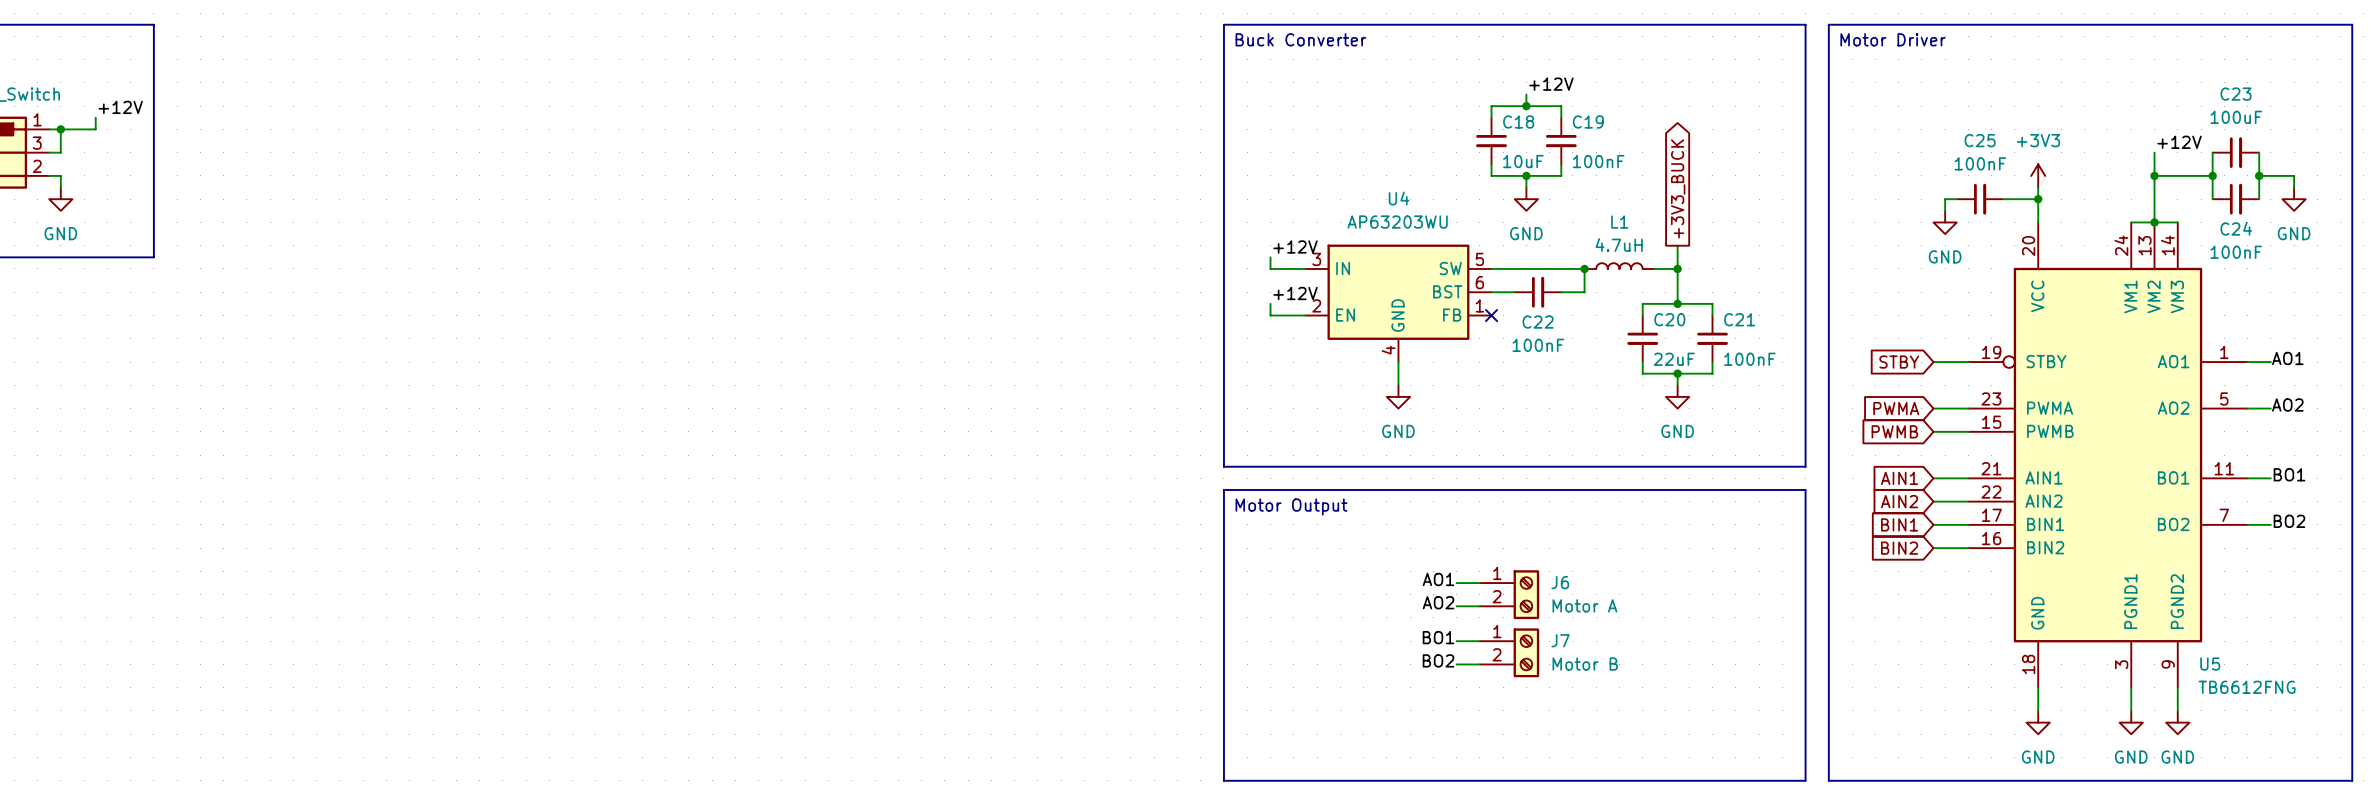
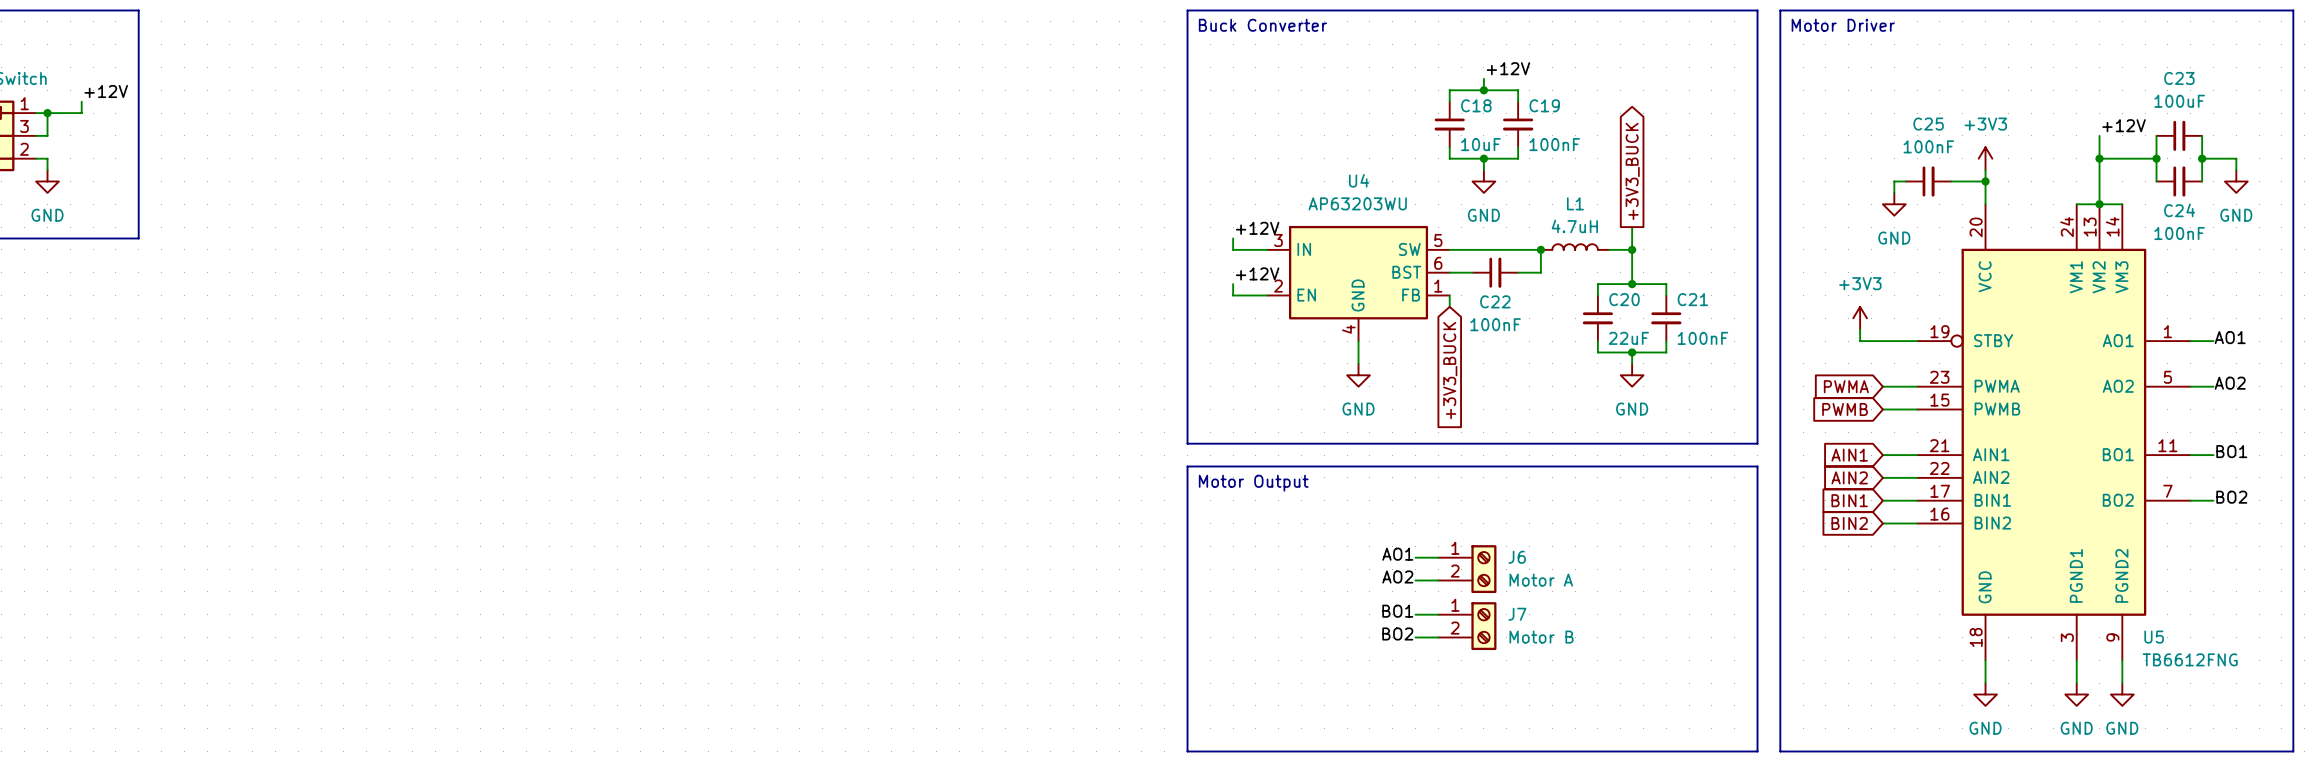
wire: none -> (1449, 295) (1449, 306)
no-connect mark: (1491, 315) -> none
power symbol: none -> +3V3 (1860, 318)
wire: none -> (1860, 329) (1860, 341) (1882, 341)
global label: STBY (1899, 362) -> none
global label: none -> +3V3_BUCK (1450, 370)

